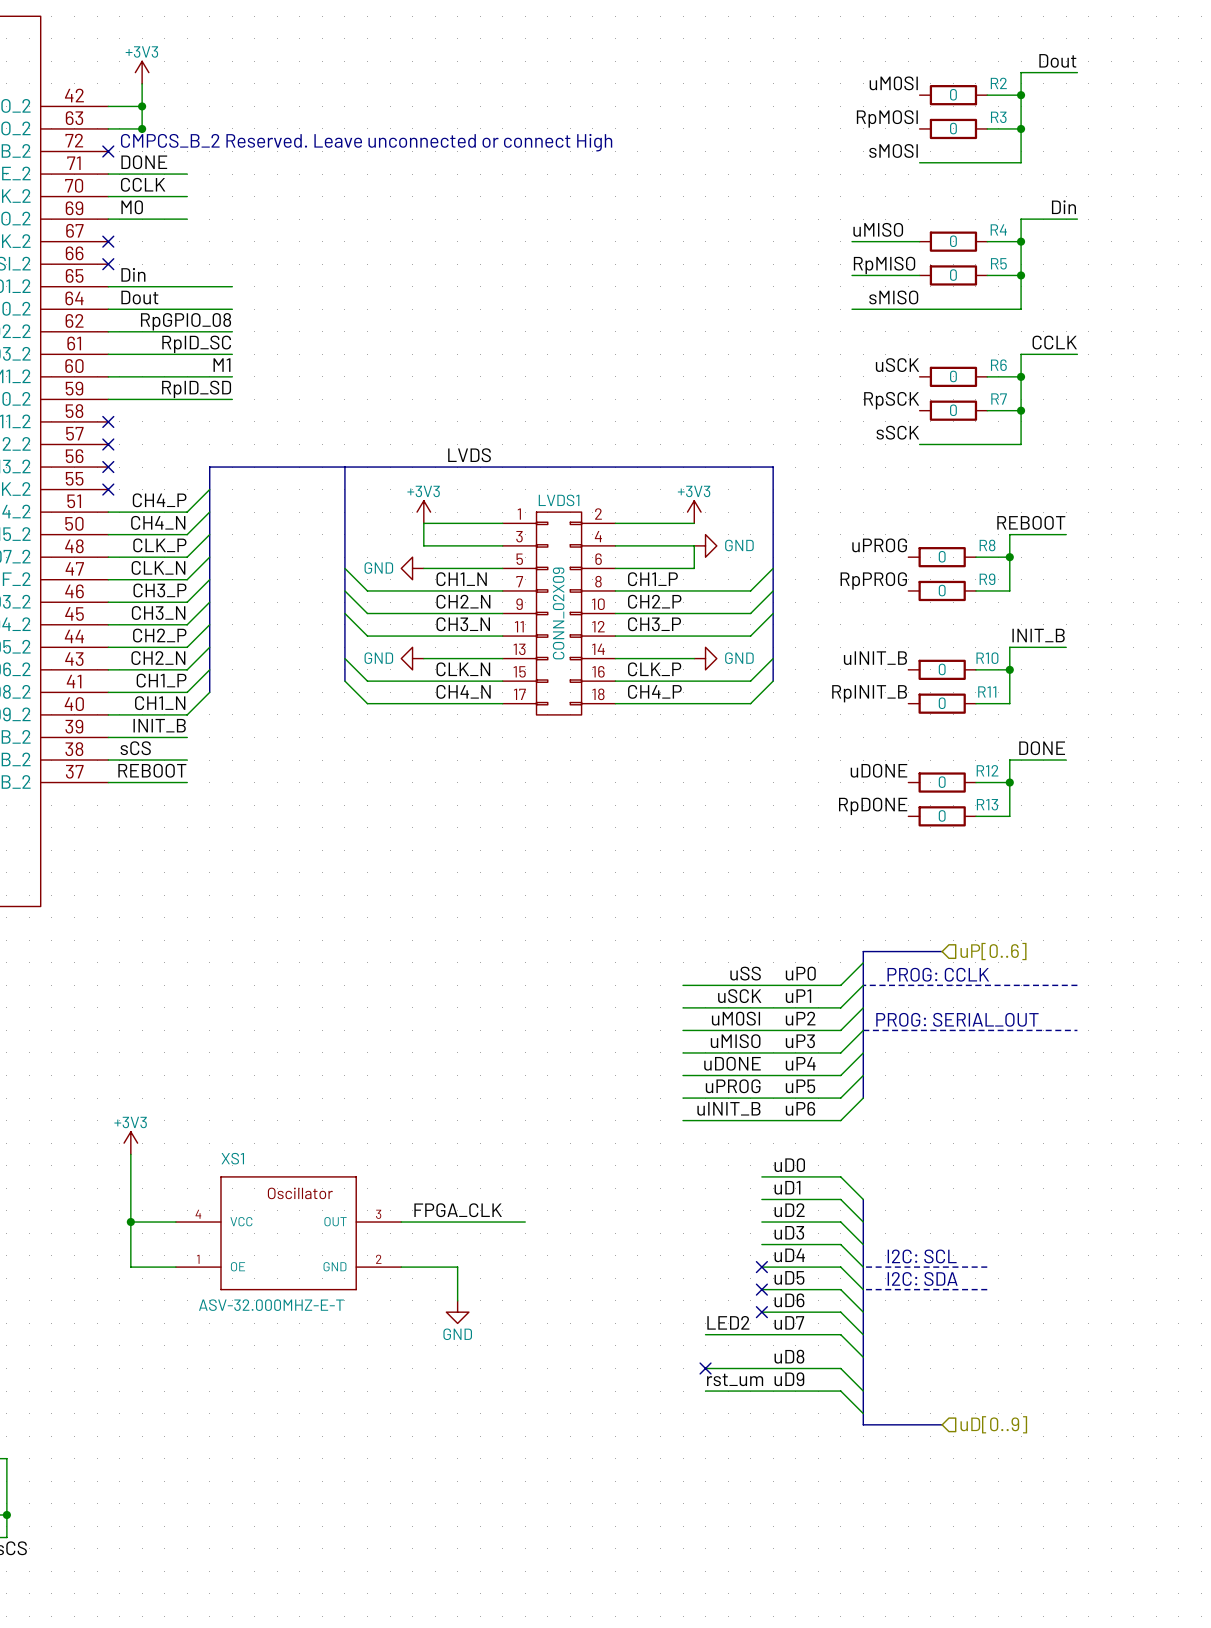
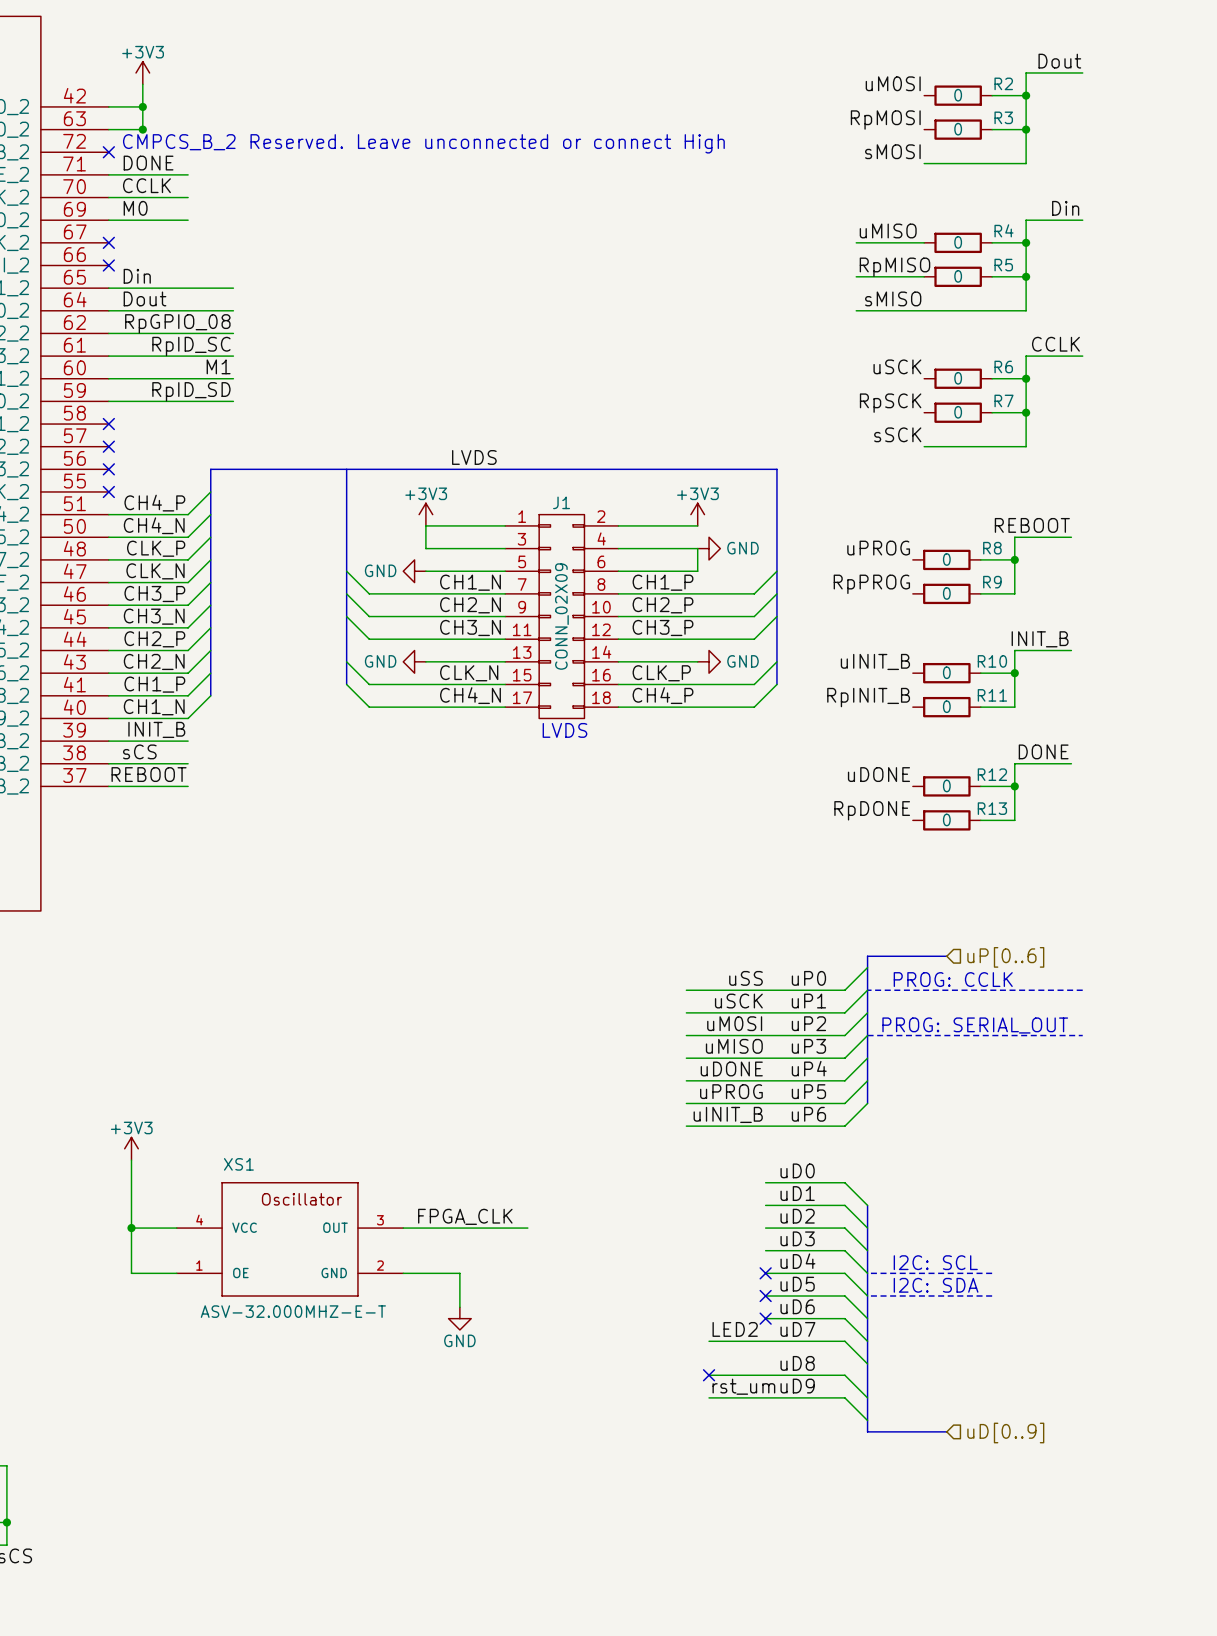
LVDS1 name: LVDS1 (559, 500) -> J1 (561, 502)
text: none -> LVDS (564, 730)

